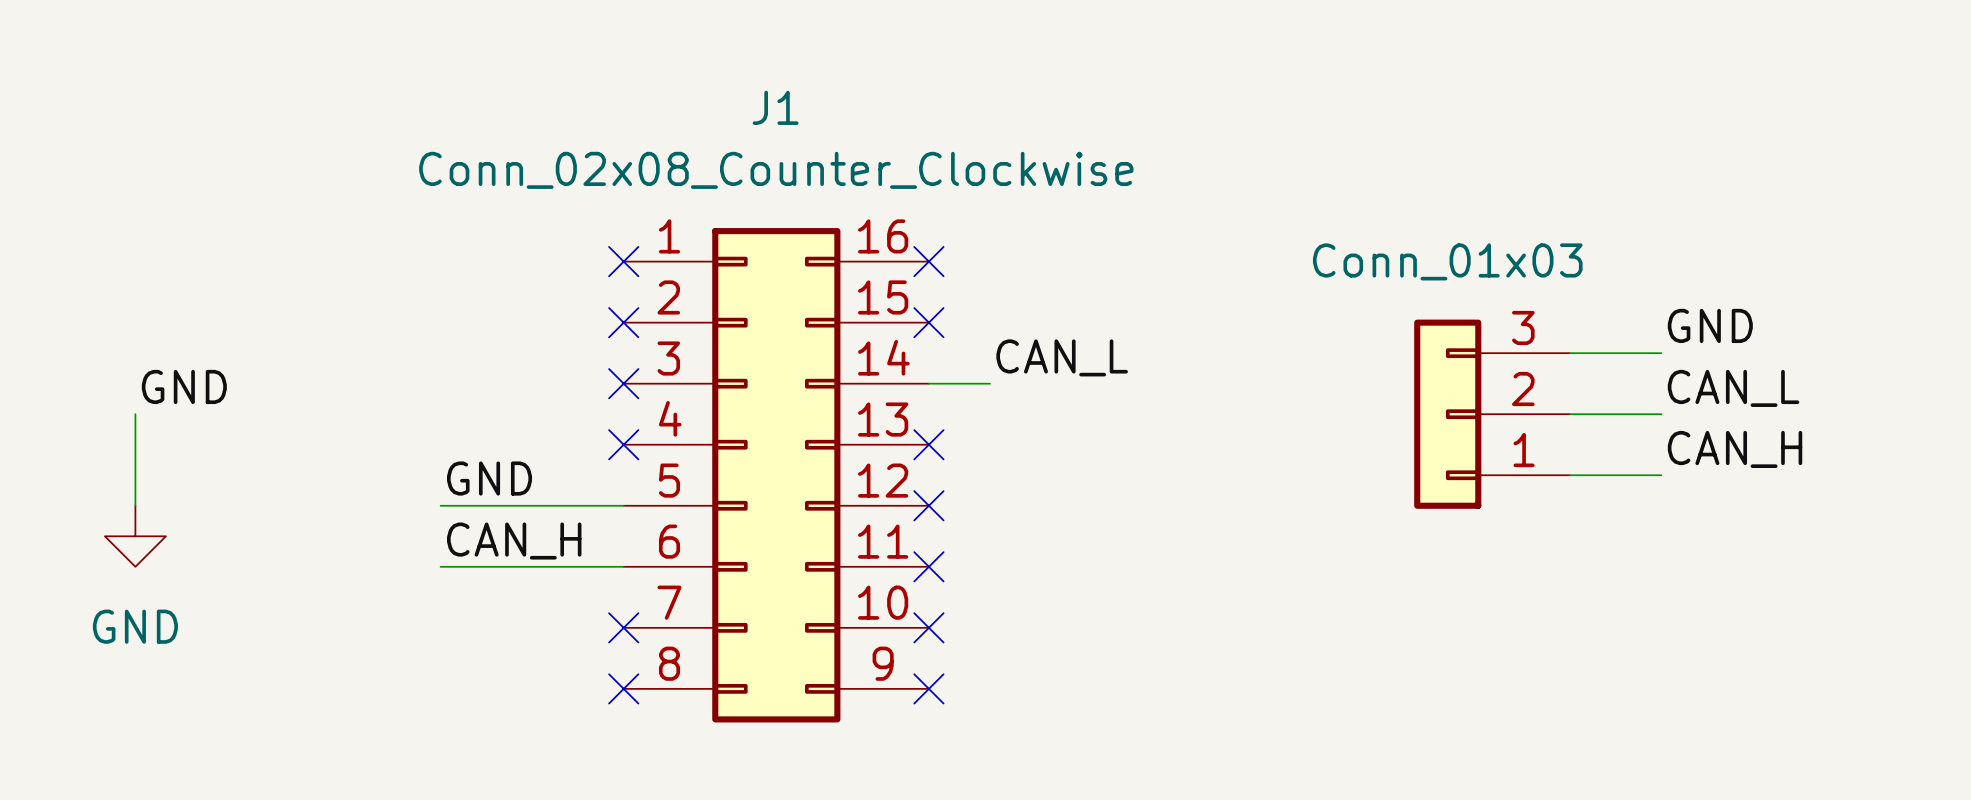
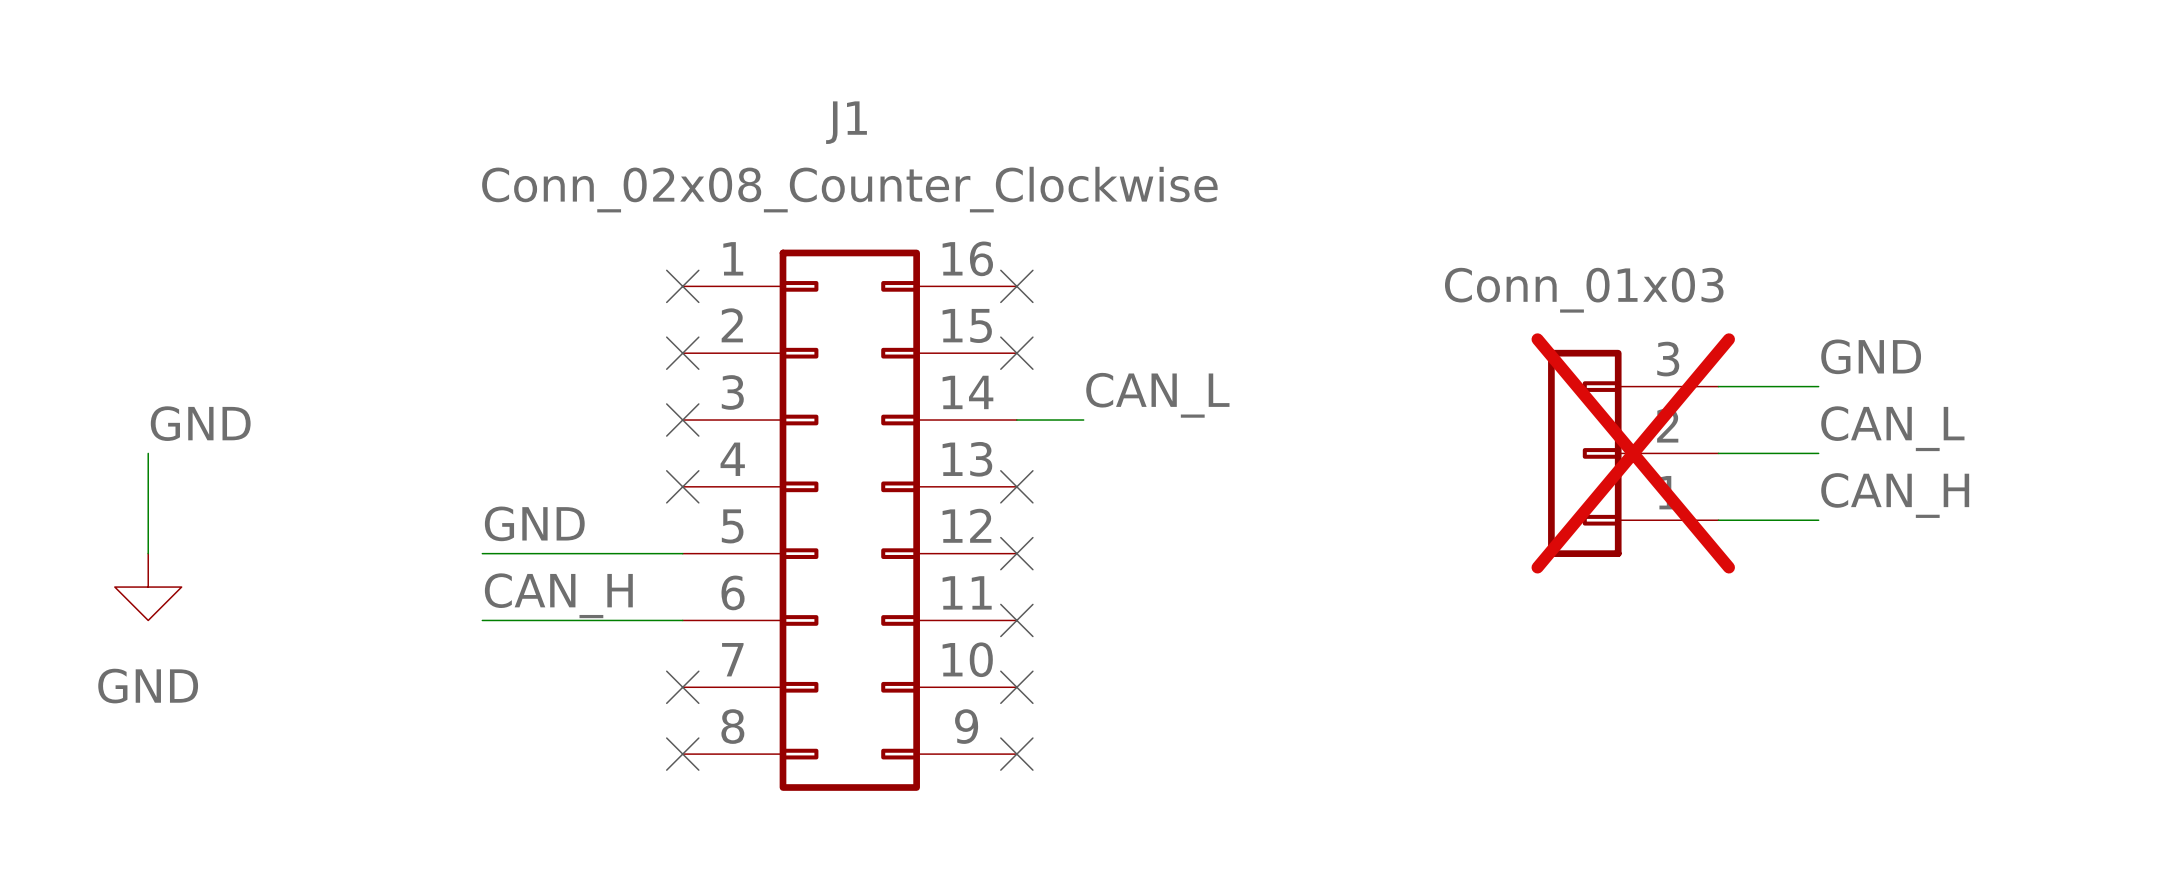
part do-not-place cross: none -> (1633, 453)

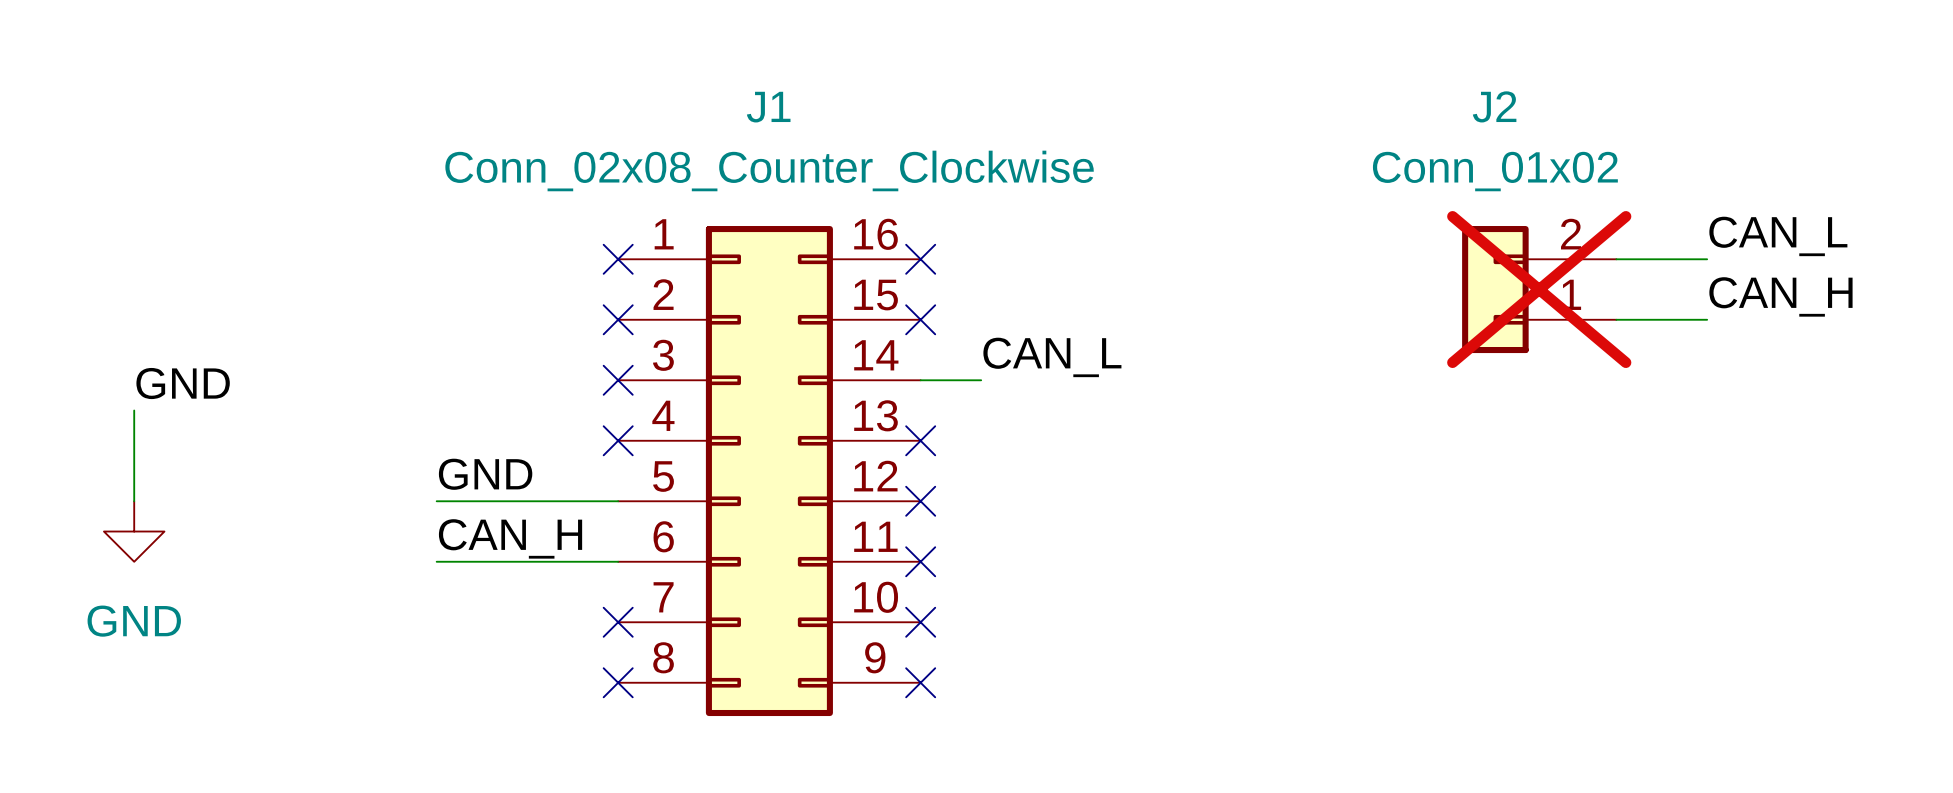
J2: none -> Conn_01x02 (1539, 289)
label: GND (1871, 356) -> none
wire: (1718, 386) (1818, 386) -> (1616, 259) (1707, 259)
label position: CAN_L (1892, 428) -> CAN_L (1778, 236)
part: Conn_01x03 (1633, 453) -> none
wire: (1718, 453) (1818, 453) -> (1616, 319) (1707, 319)
label position: CAN_H (1895, 495) -> CAN_H (1780, 296)
wire: (1718, 520) (1818, 520) -> none

